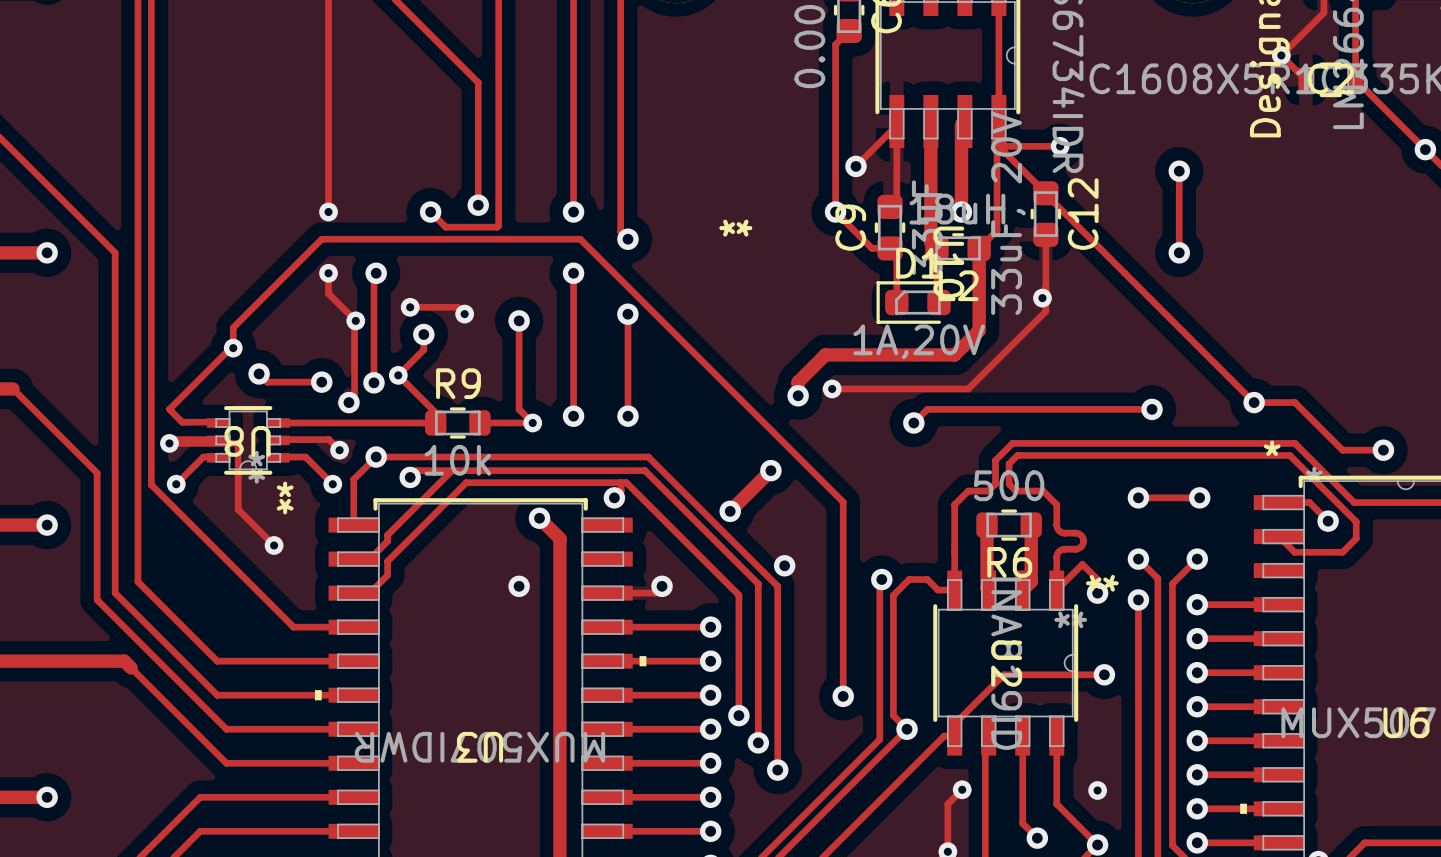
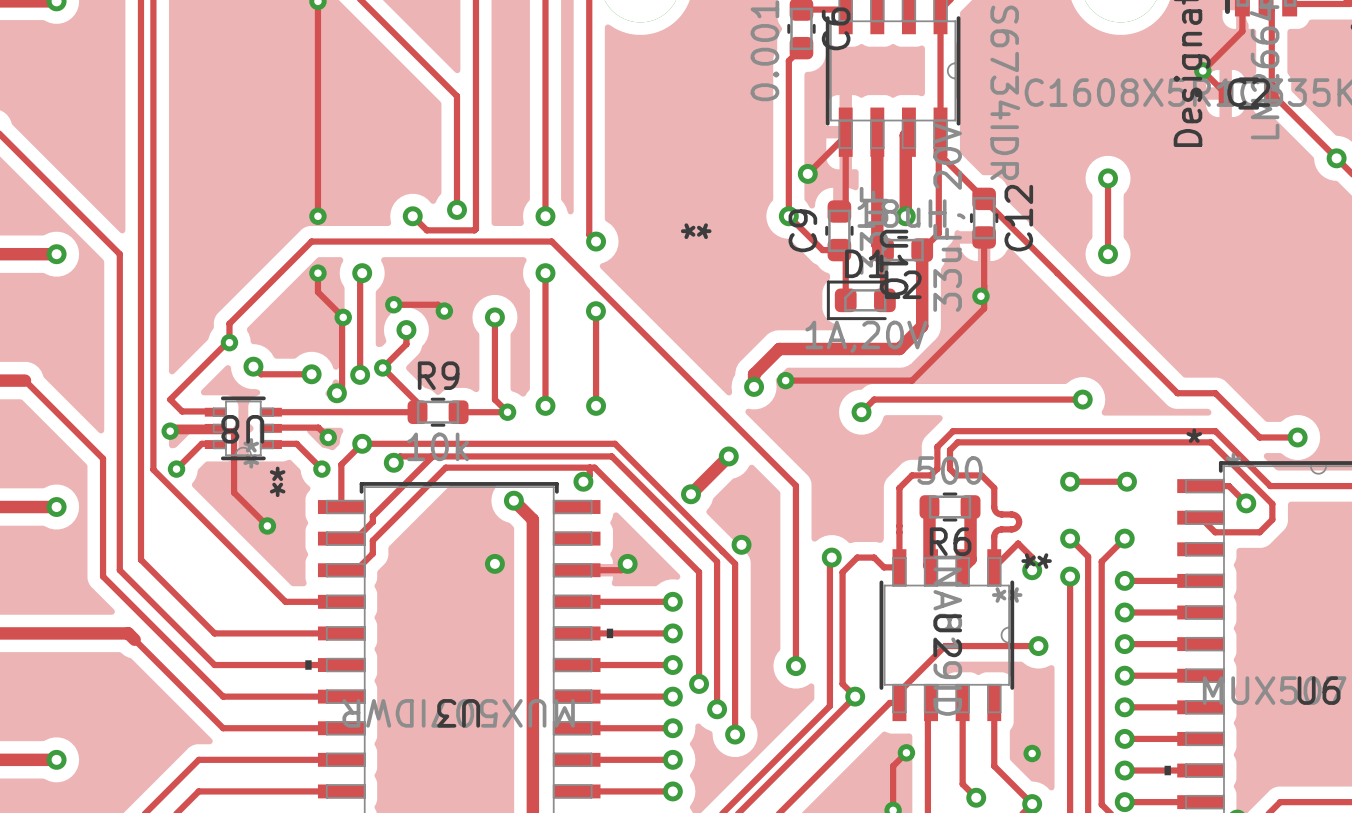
track: (998, 146) (1060, 146) -> none
via: (1060, 146) -> none
via: (1254, 402) -> none

